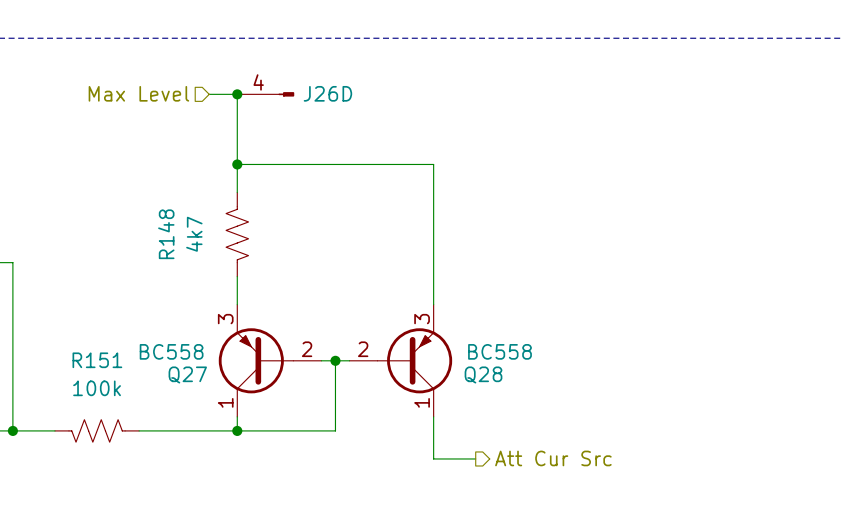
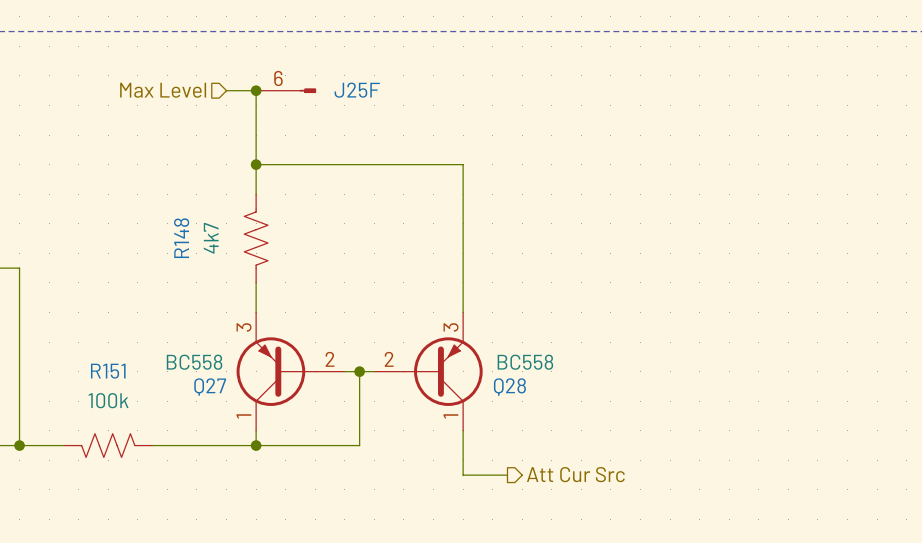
J26D pin number: 4 (258, 82) -> 6 (278, 78)
J26D name: J26D (327, 93) -> J25F (357, 90)

